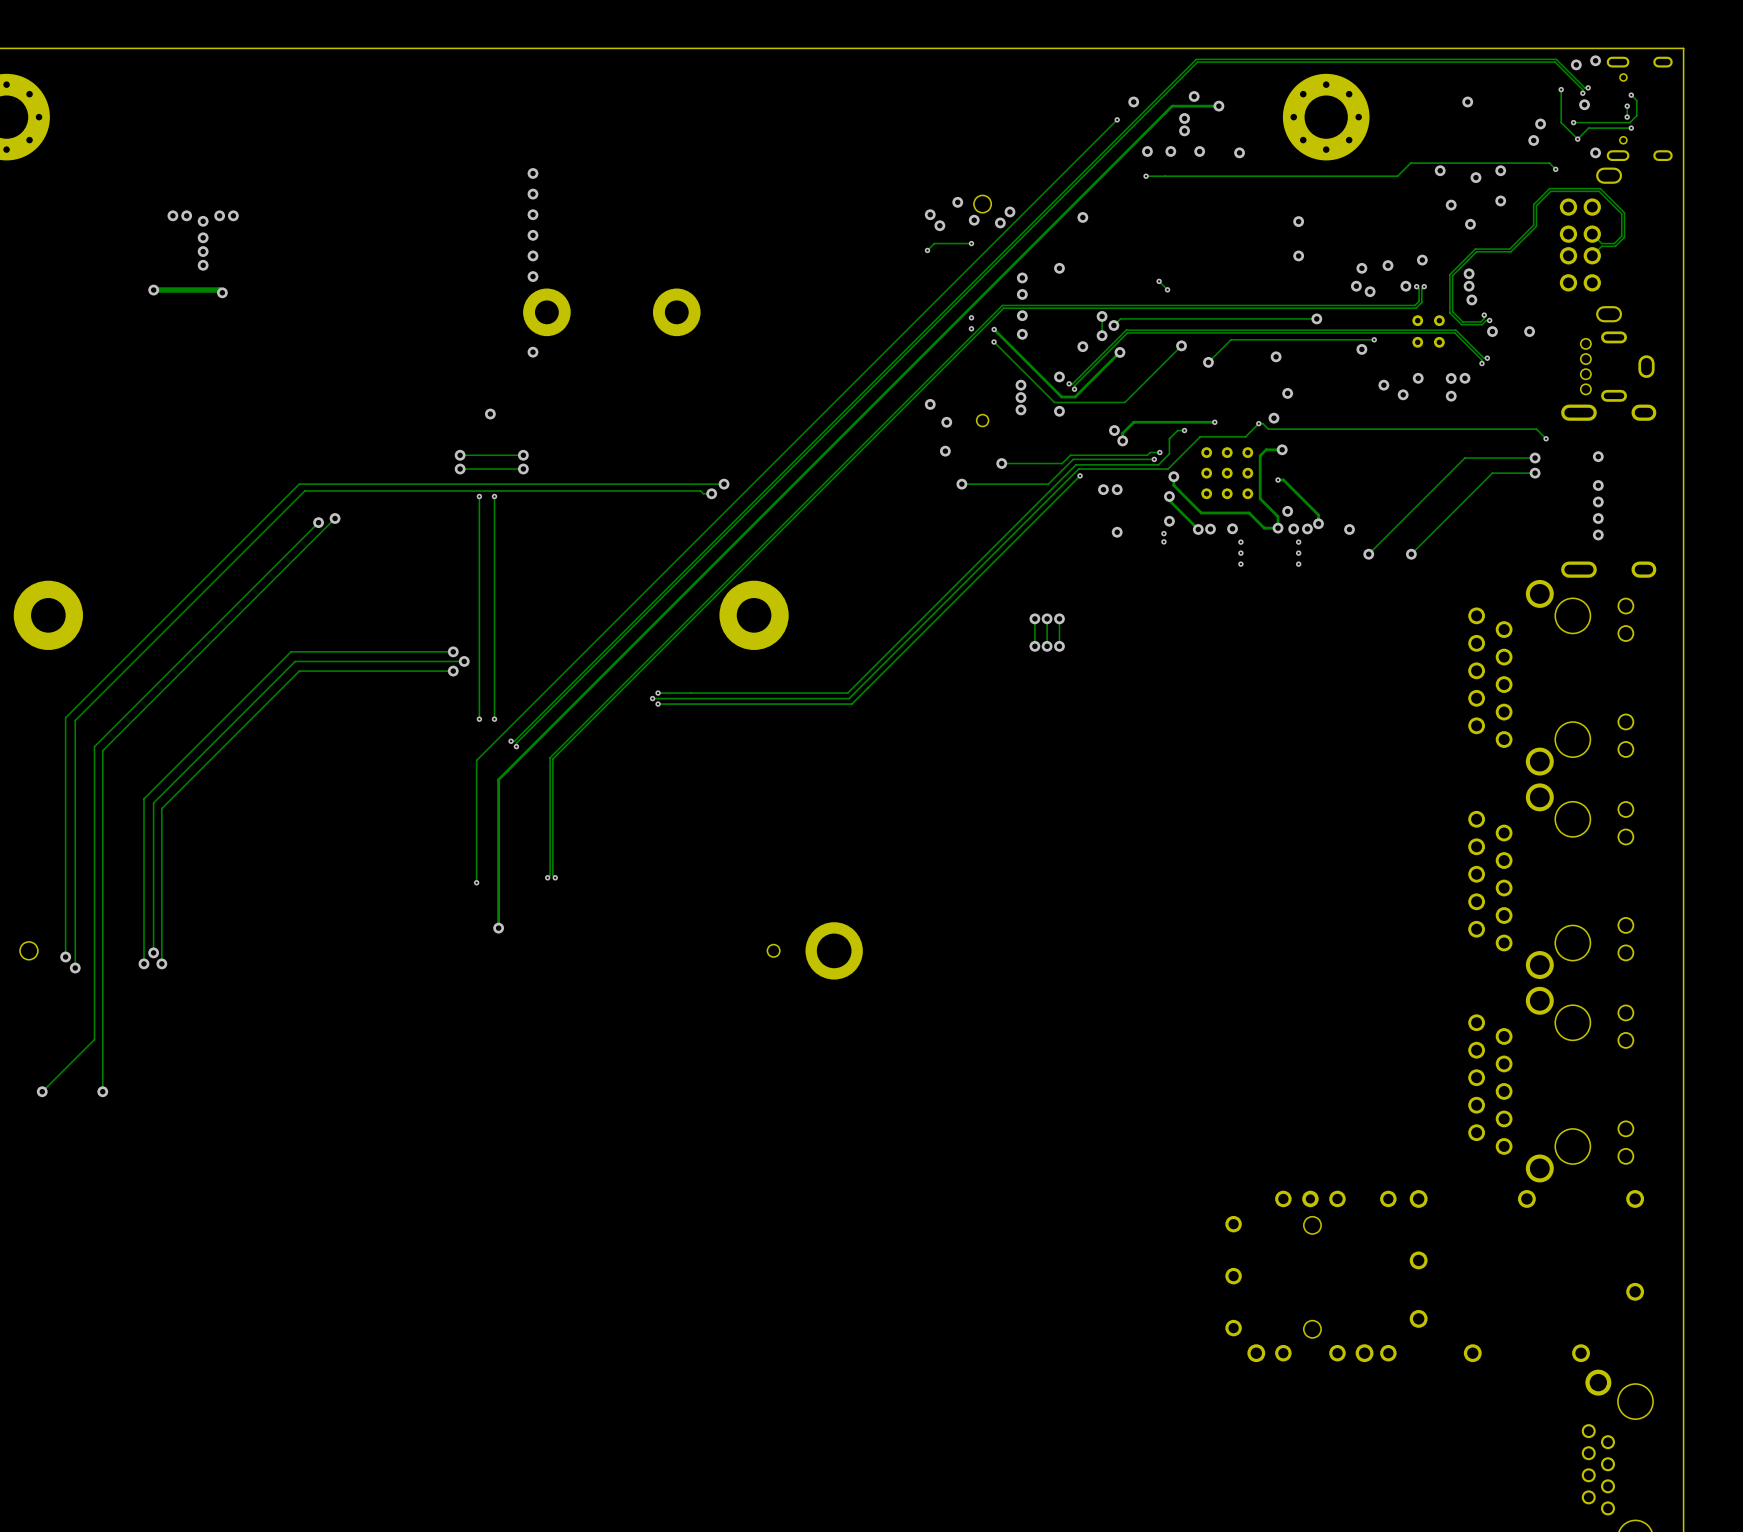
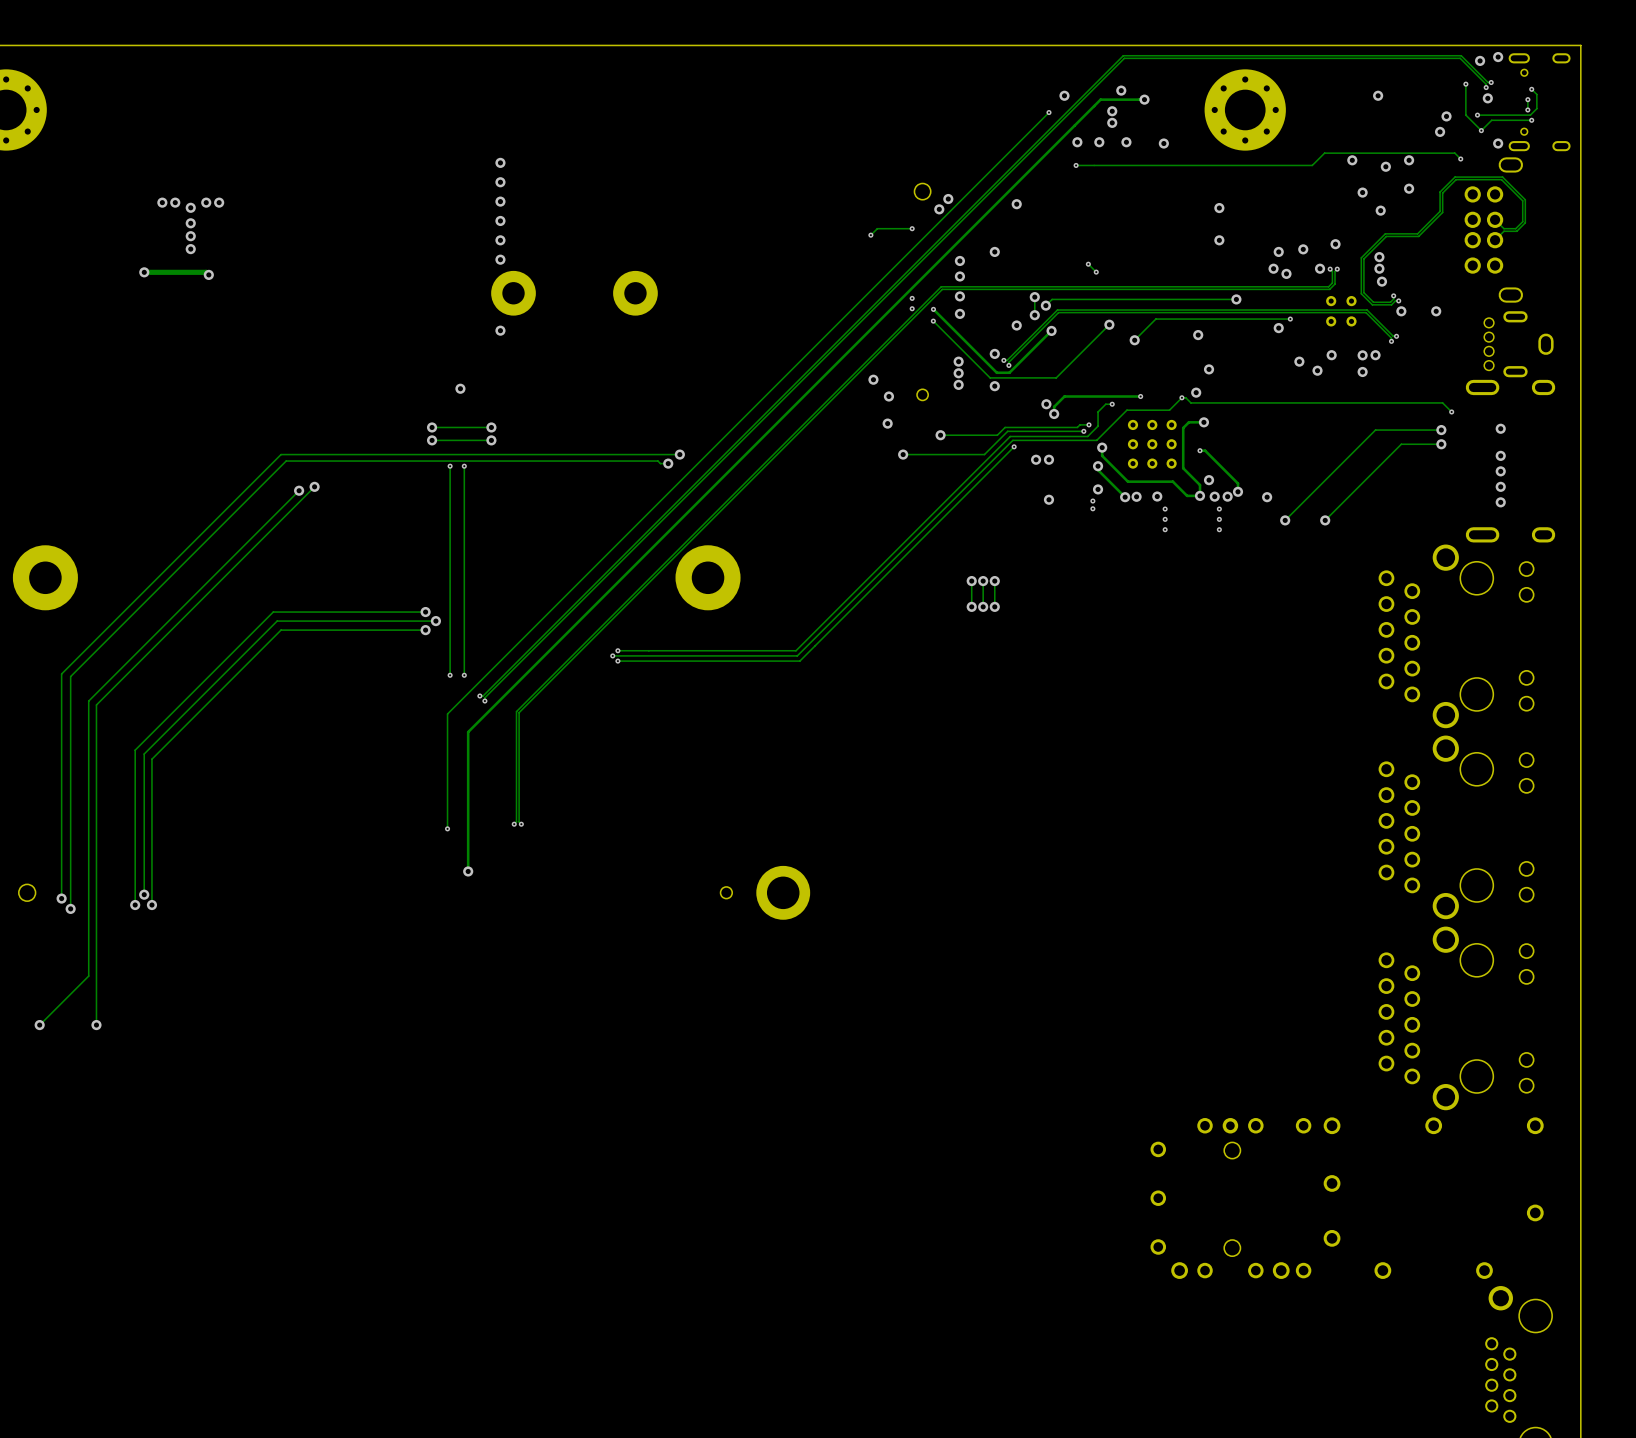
via: (957, 202) -> none
via: (930, 214) -> none
via: (974, 220) -> none
via: (939, 225) -> none

